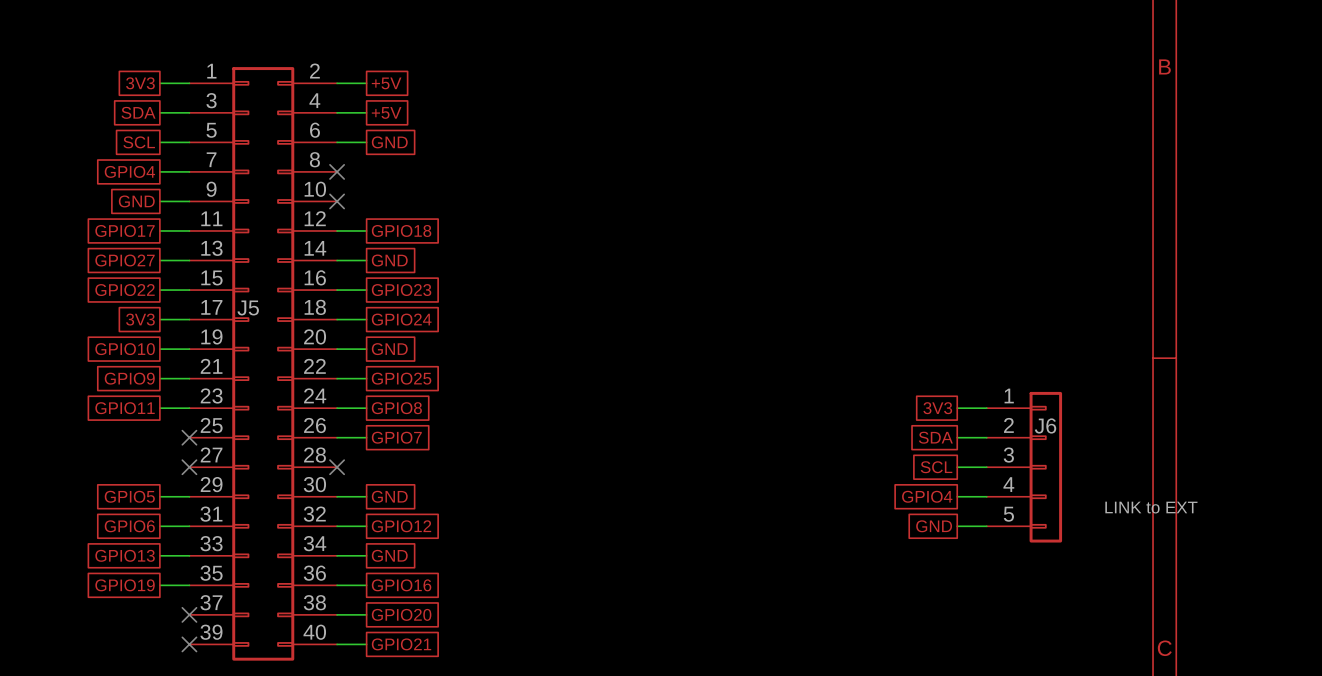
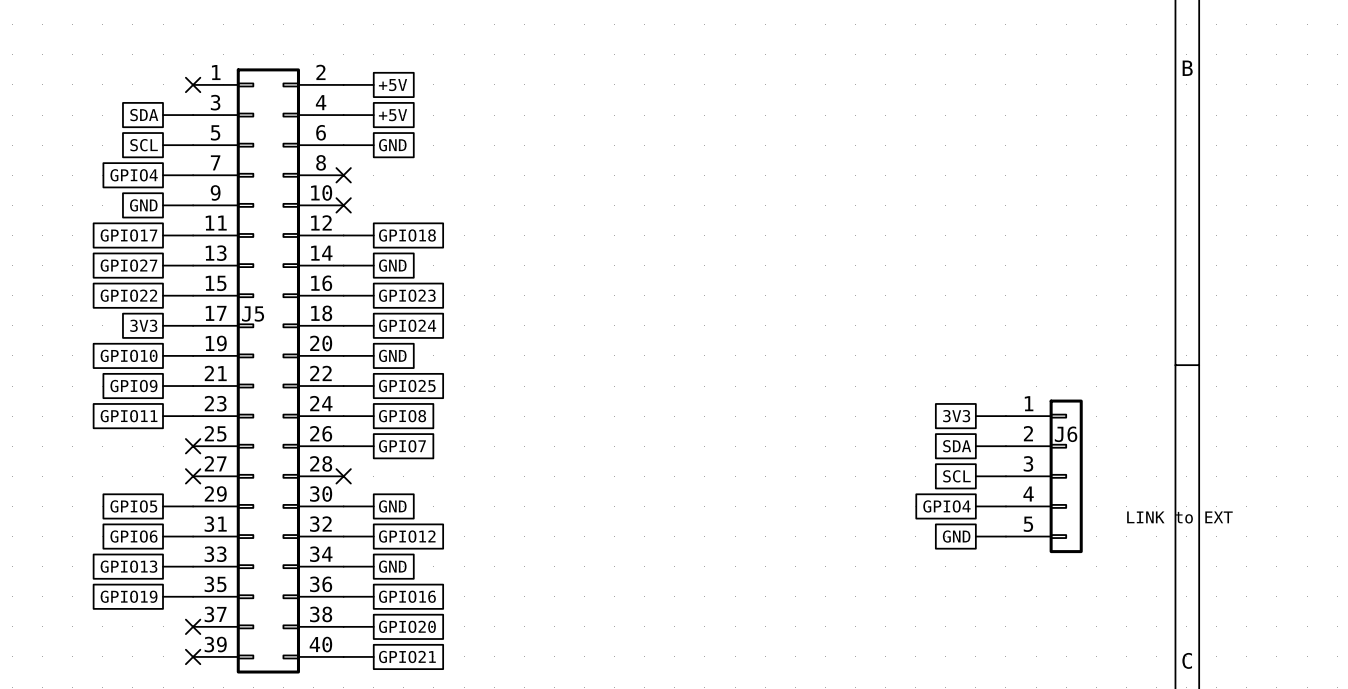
global label: 3V3 (140, 83) -> none
wire: (159, 83) (189, 83) -> none
no-connect mark: none -> (193, 84)

